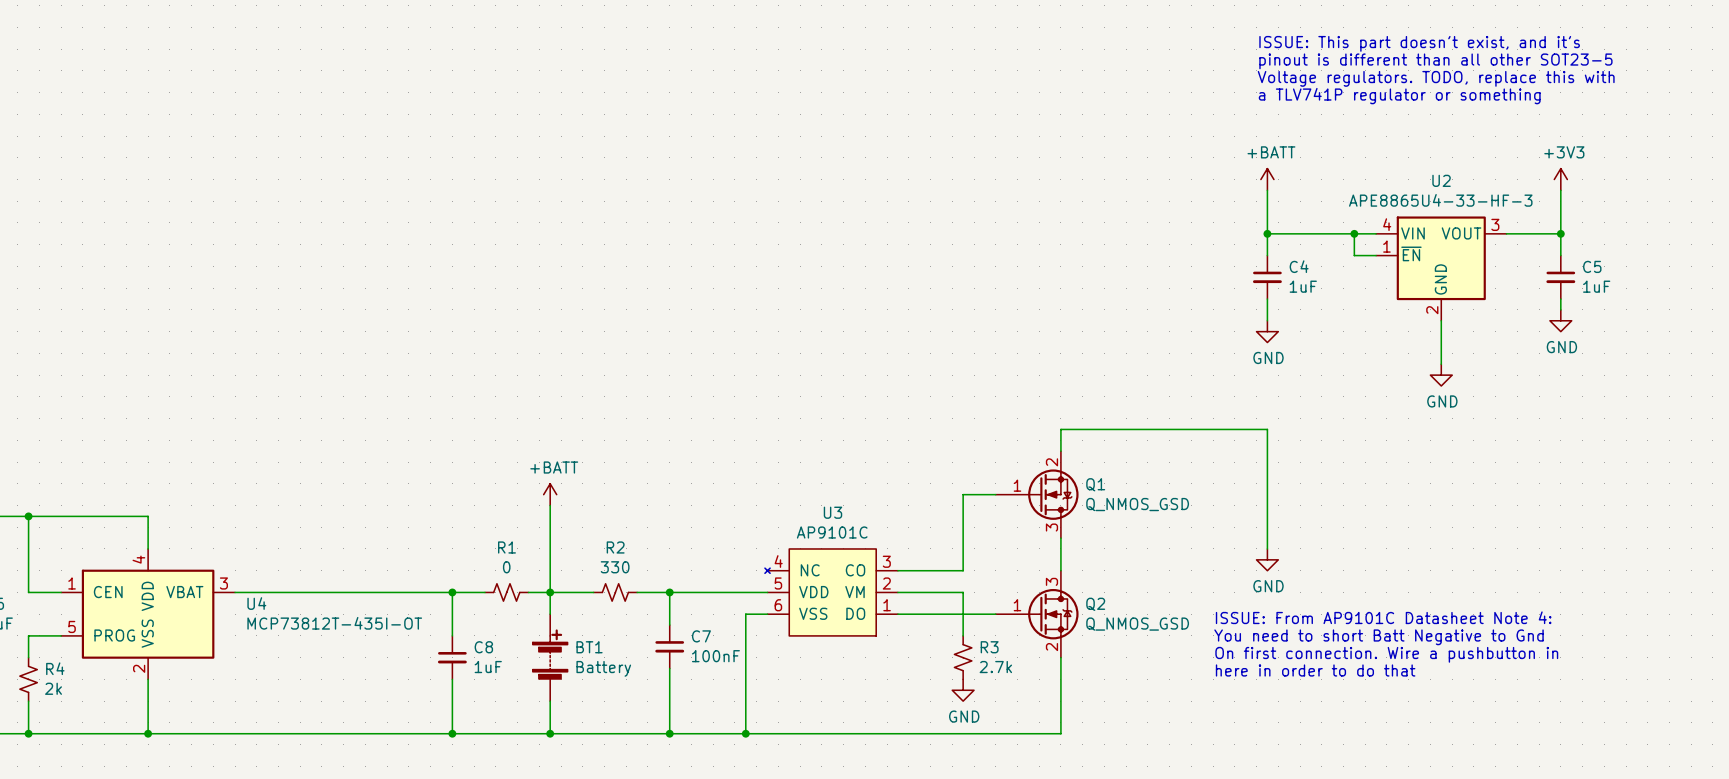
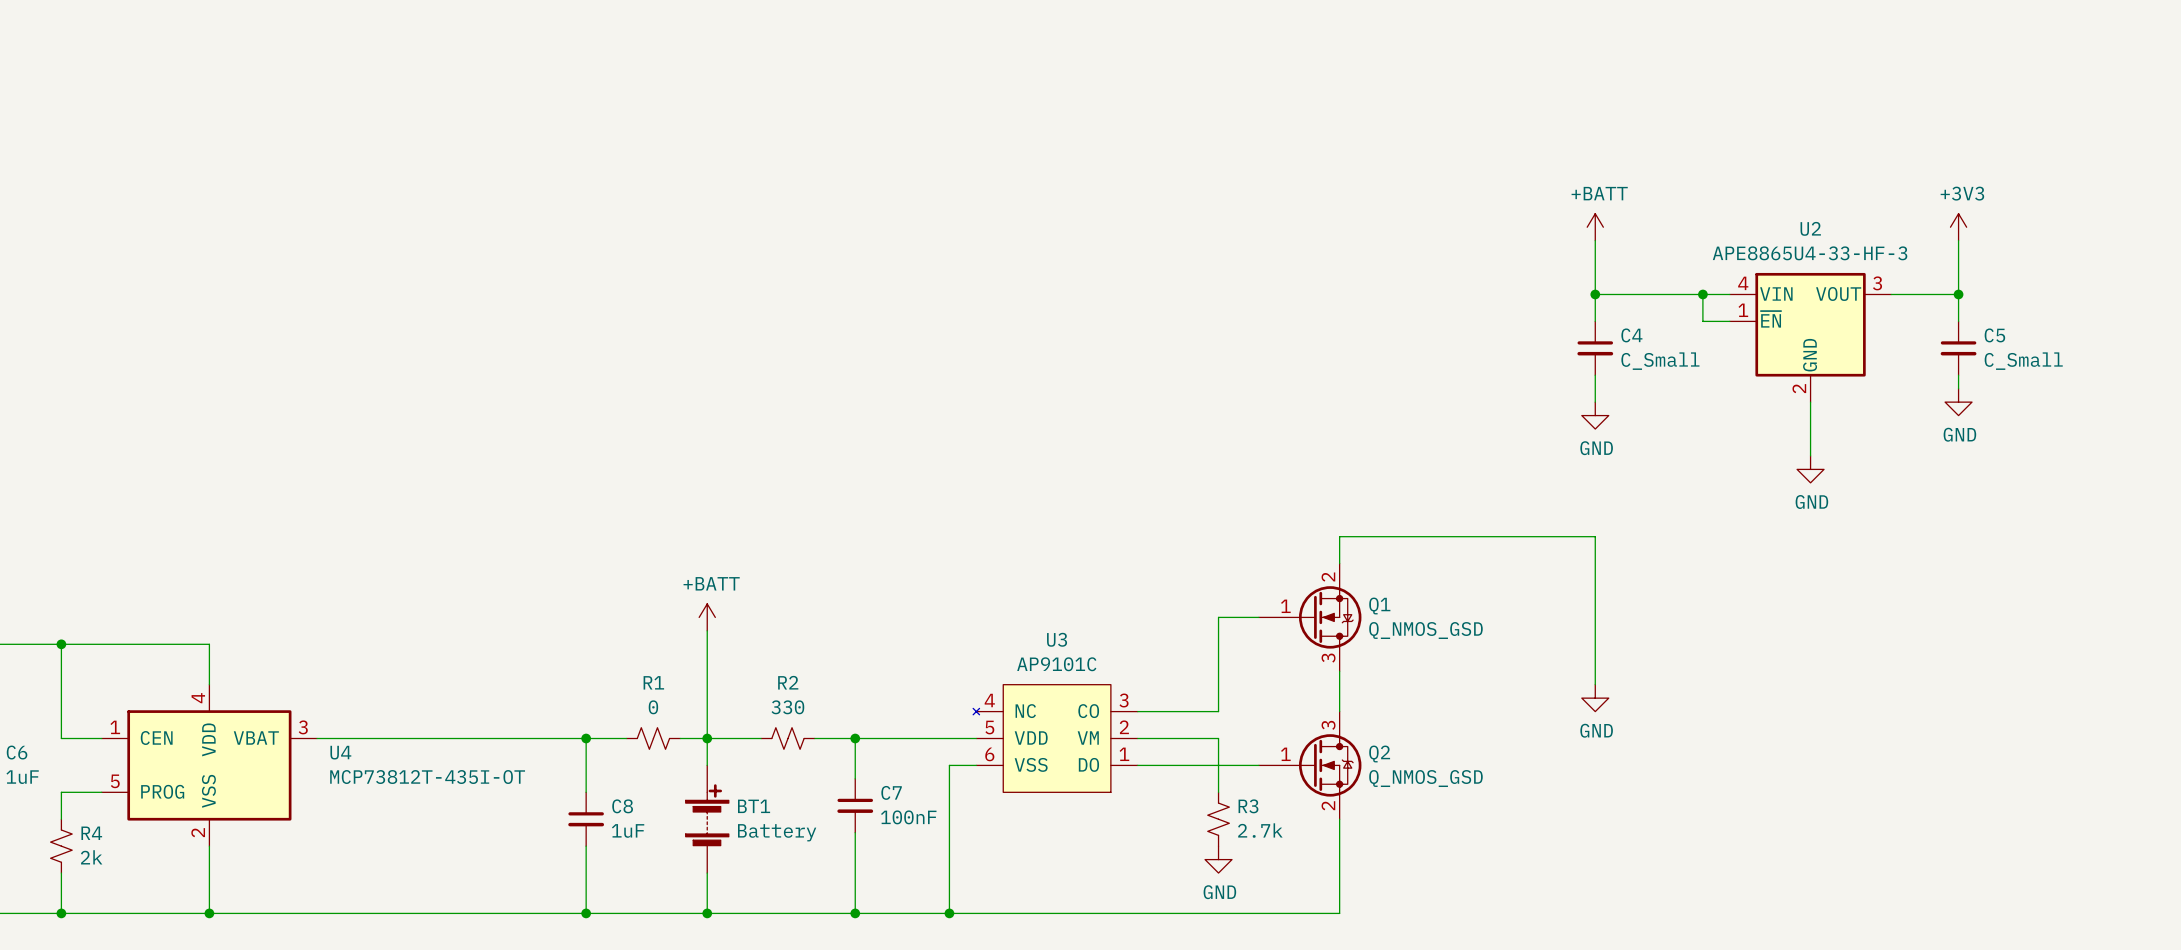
text: ISSUE: This part doesn't exist, and it's (1419, 43) -> none
text: pinout is different than all other SOT23-5 (1435, 61) -> none
text: Voltage regulators. TODO, replace this with (1436, 78) -> none
text: a TLV741P regulator or something (1399, 96) -> none
C4 value: 1uF (1303, 286) -> C_Small (1660, 361)
C5 value: 1uF (1596, 286) -> C_Small (2023, 361)
text: ISSUE: From AP9101C Datasheet Note 4: (1383, 617) -> none
text: You need to short Batt Negative to Gnd (1379, 637) -> none
text: On first connection. Wire a pushbutton in (1386, 654) -> none
text: here in order to do that (1315, 670) -> none

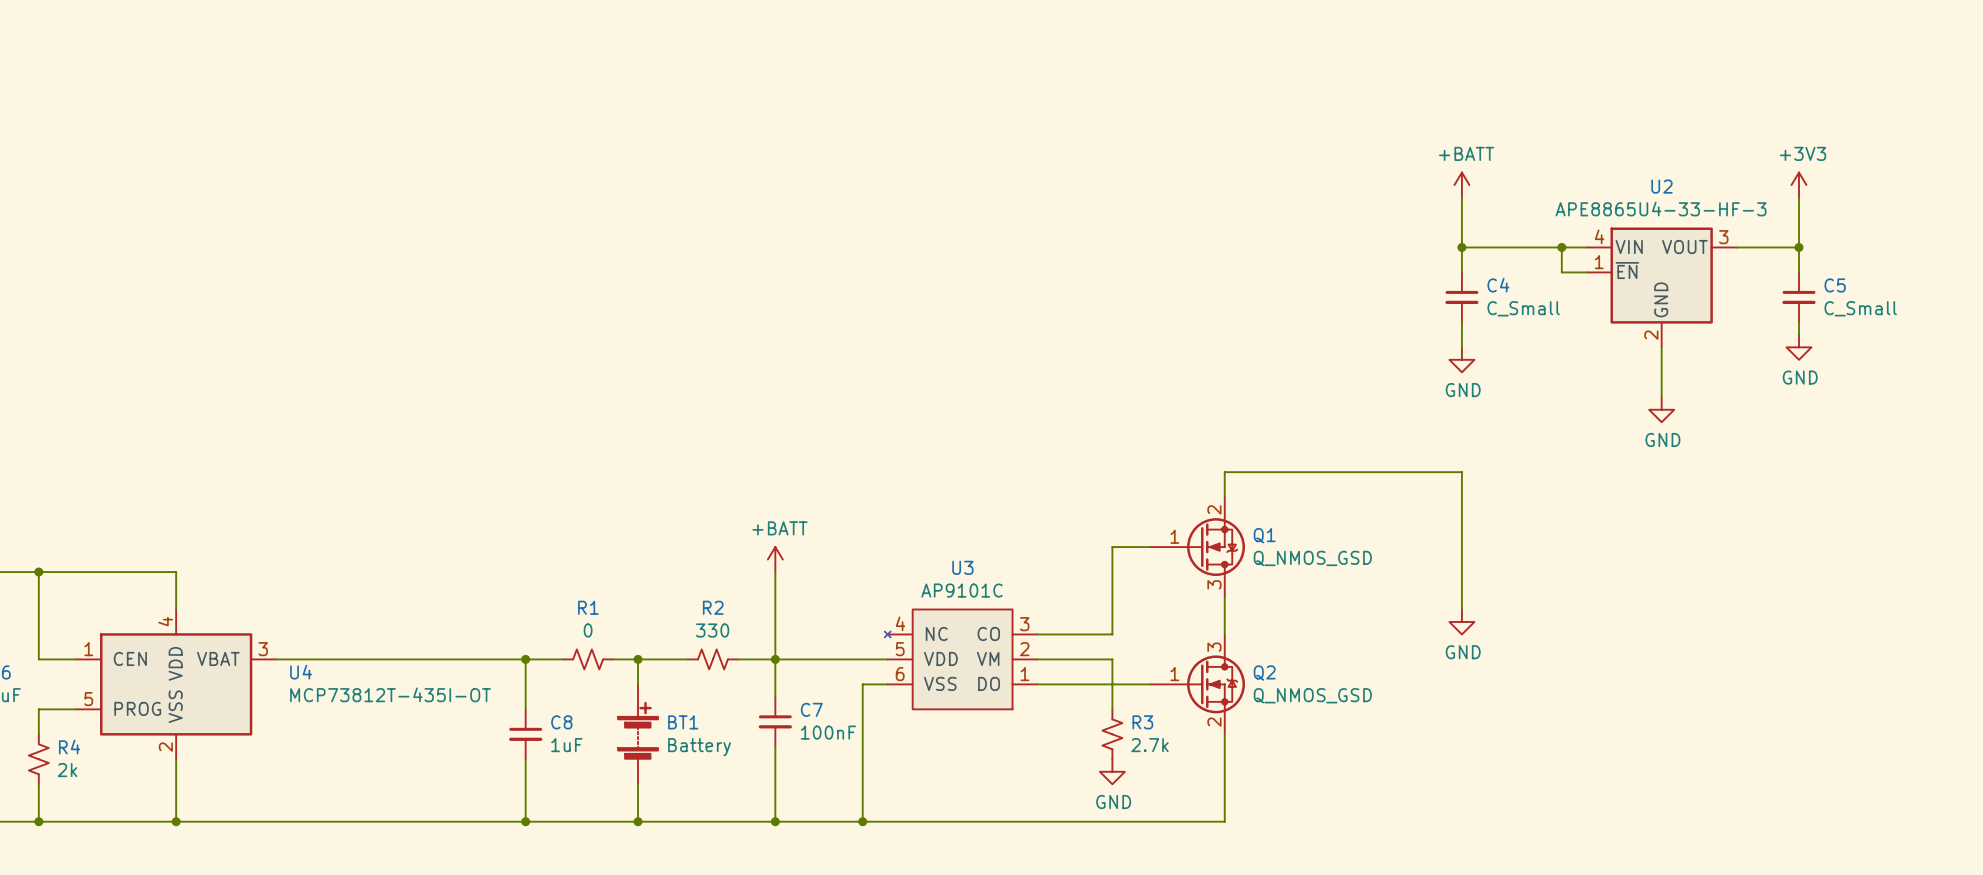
power symbol position: +BATT (707, 617) -> +BATT (775, 559)
wire: (707, 630) (707, 738) -> none
wire: none -> (775, 572) (775, 659)

